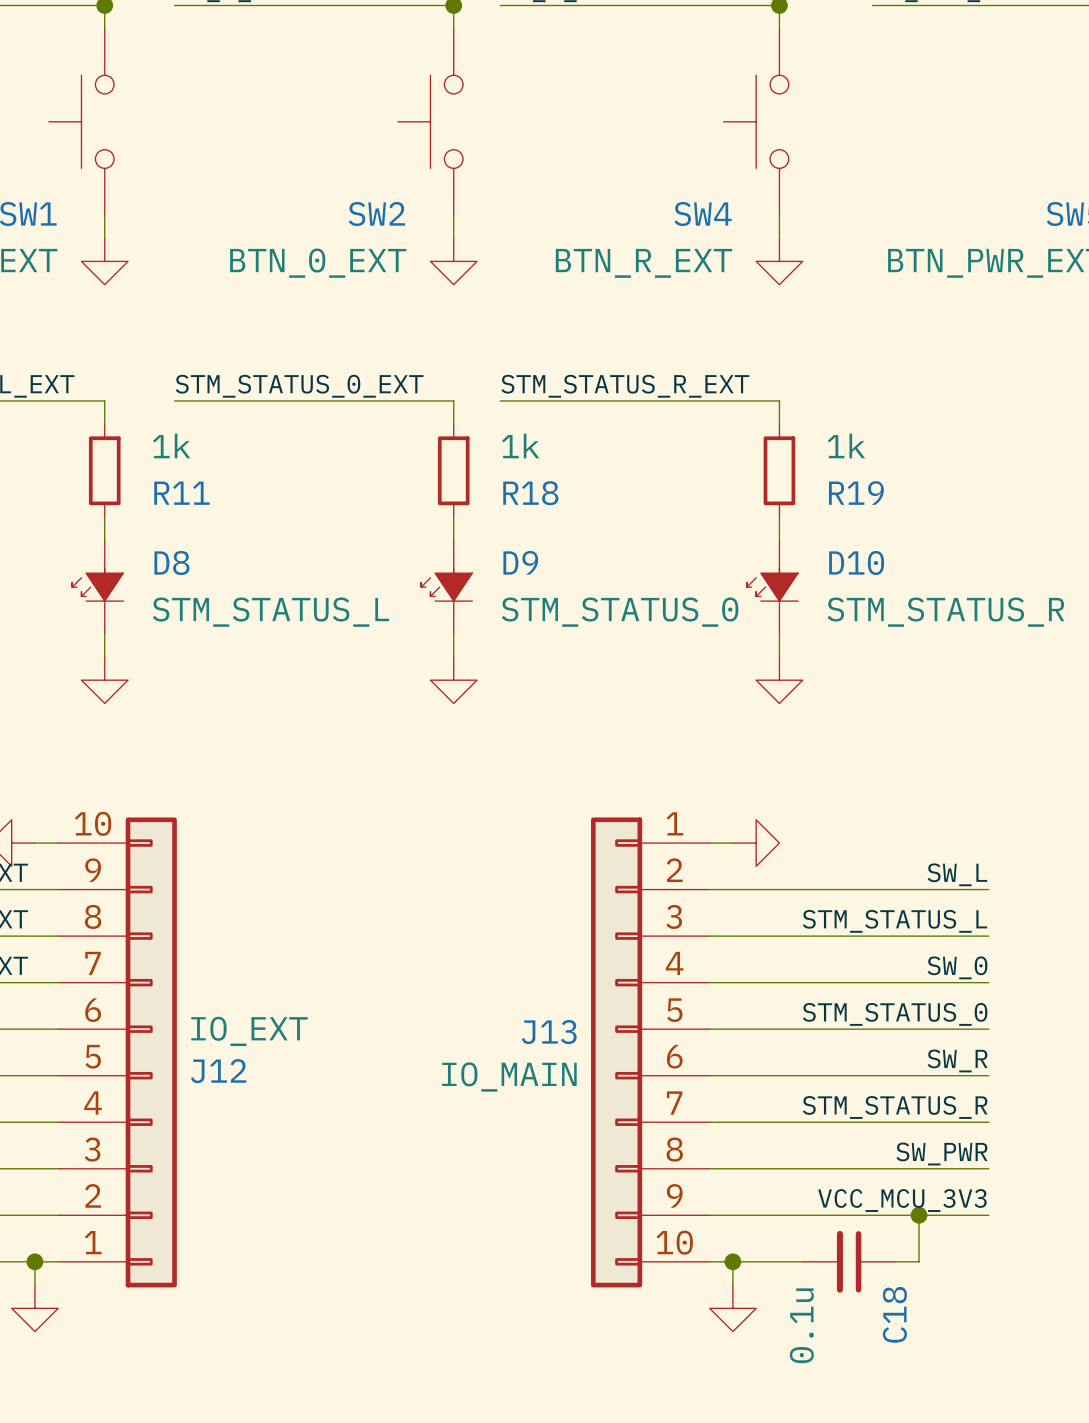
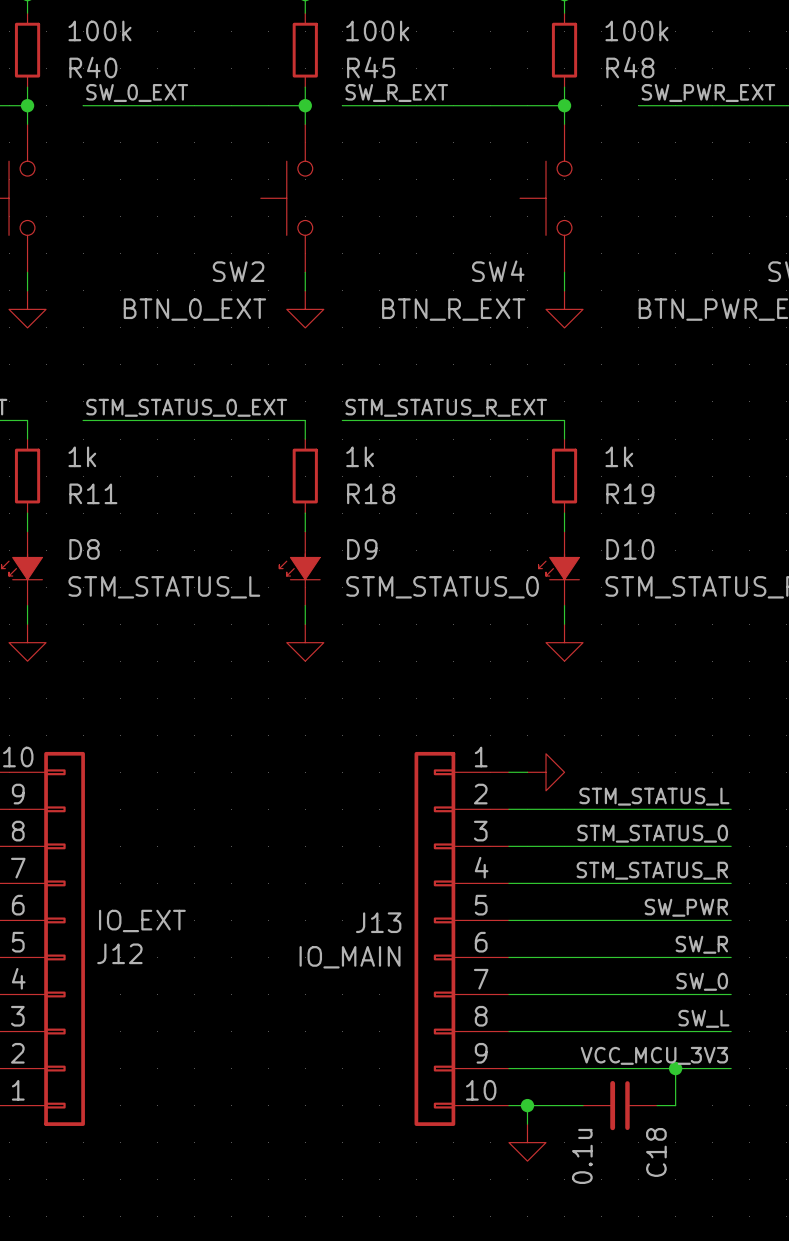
label: SW_L (957, 874) -> STM_STATUS_L (654, 796)
label: STM_STATUS_L (894, 921) -> STM_STATUS_0 (652, 833)
label: SW_0 (957, 967) -> STM_STATUS_R (652, 870)
label: STM_STATUS_0 (895, 1014) -> SW_PWR (686, 907)
label: STM_STATUS_R (895, 1107) -> SW_0 (702, 981)
label: SW_PWR (941, 1154) -> SW_L (703, 1018)

